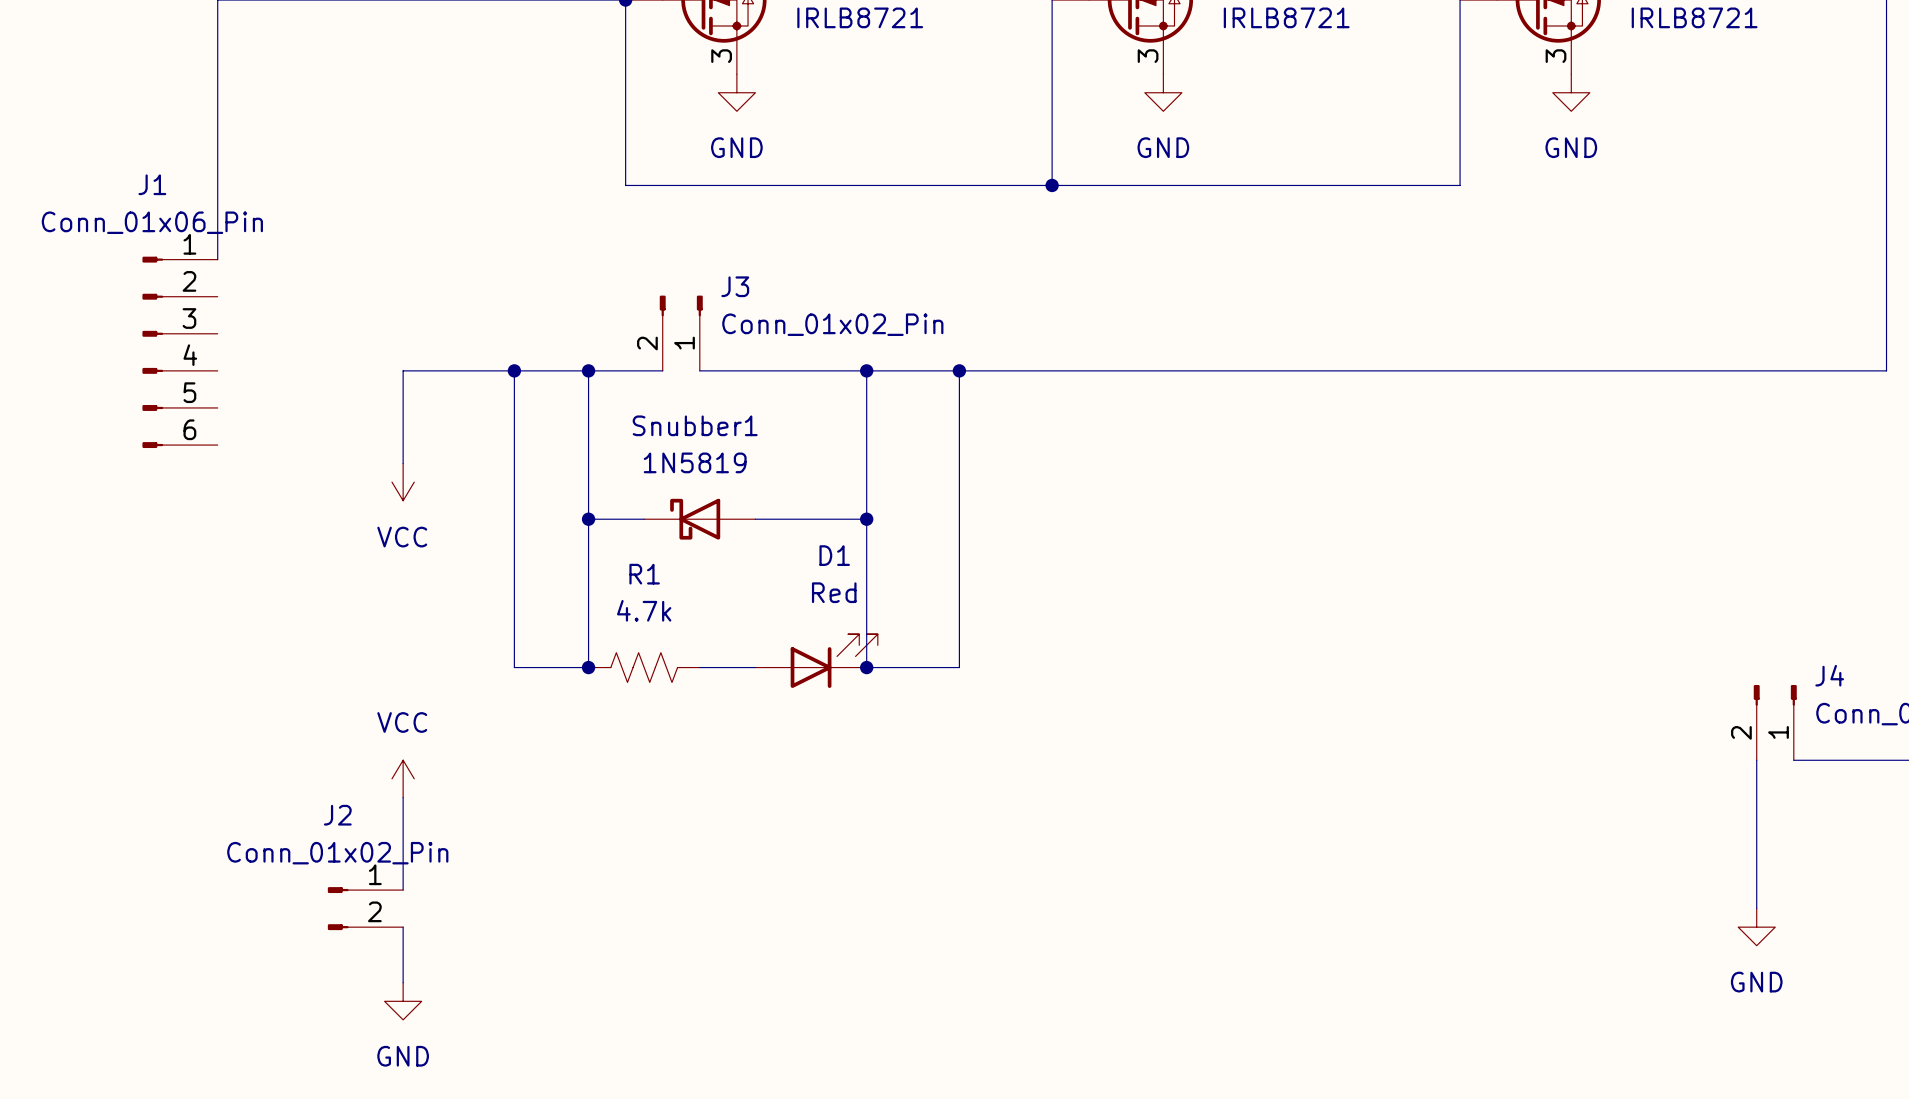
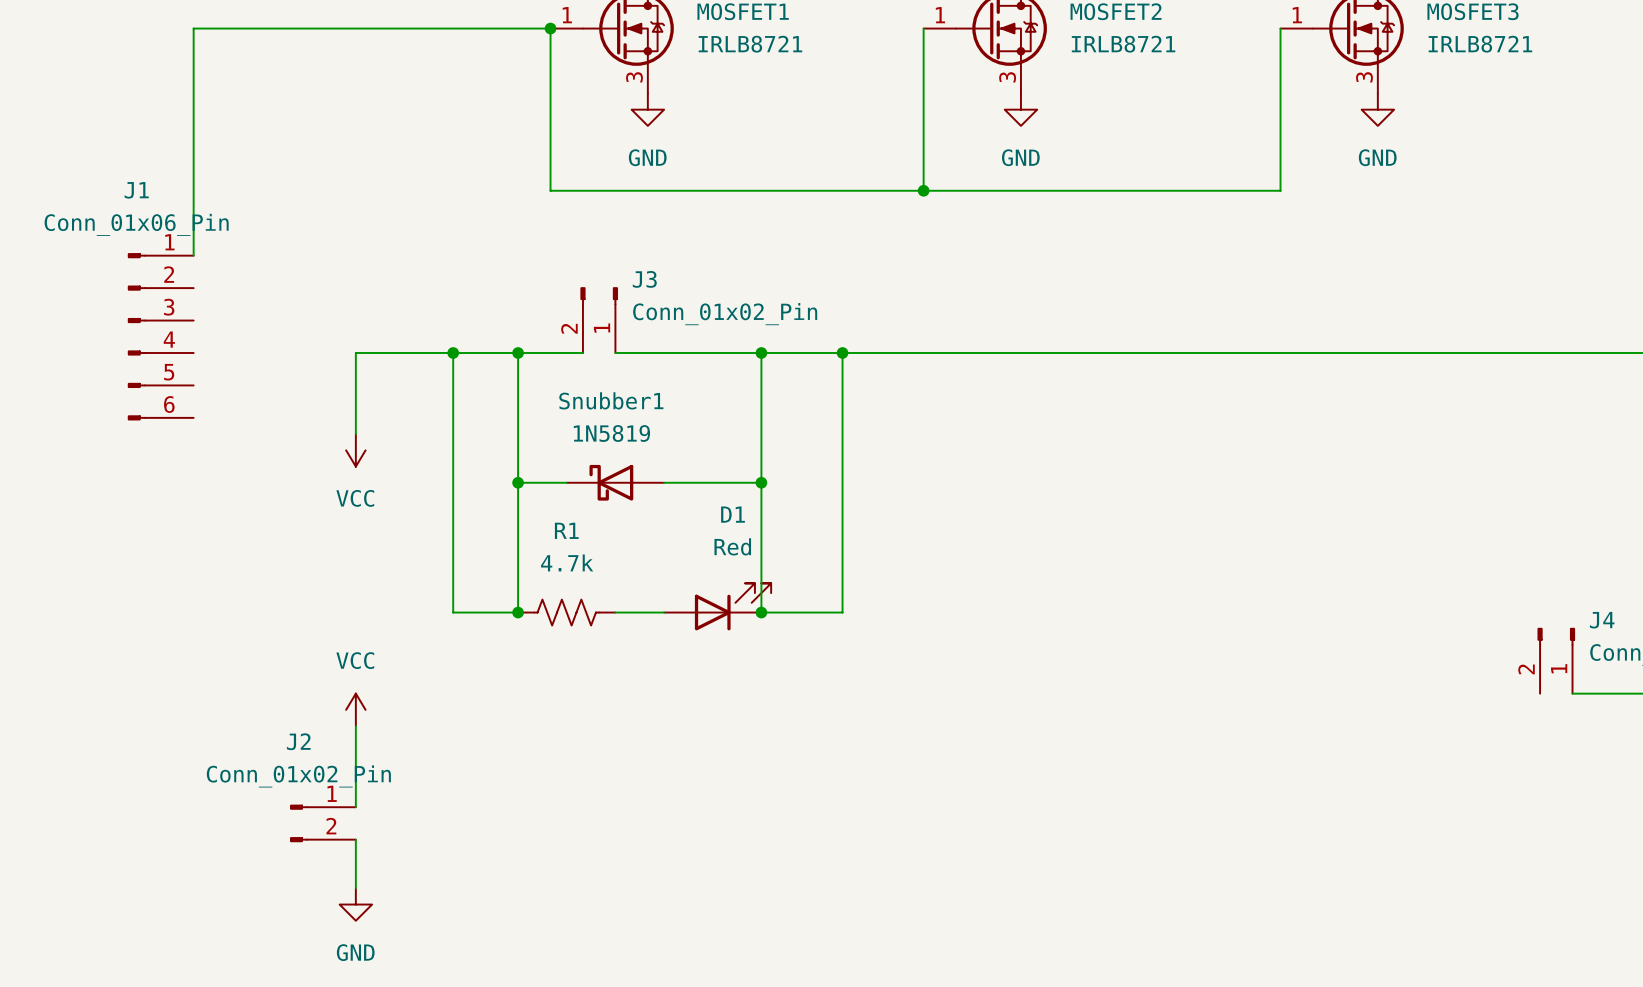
wire: (1756, 760) (1756, 908) -> none
power symbol: GND (1756, 927) -> none

